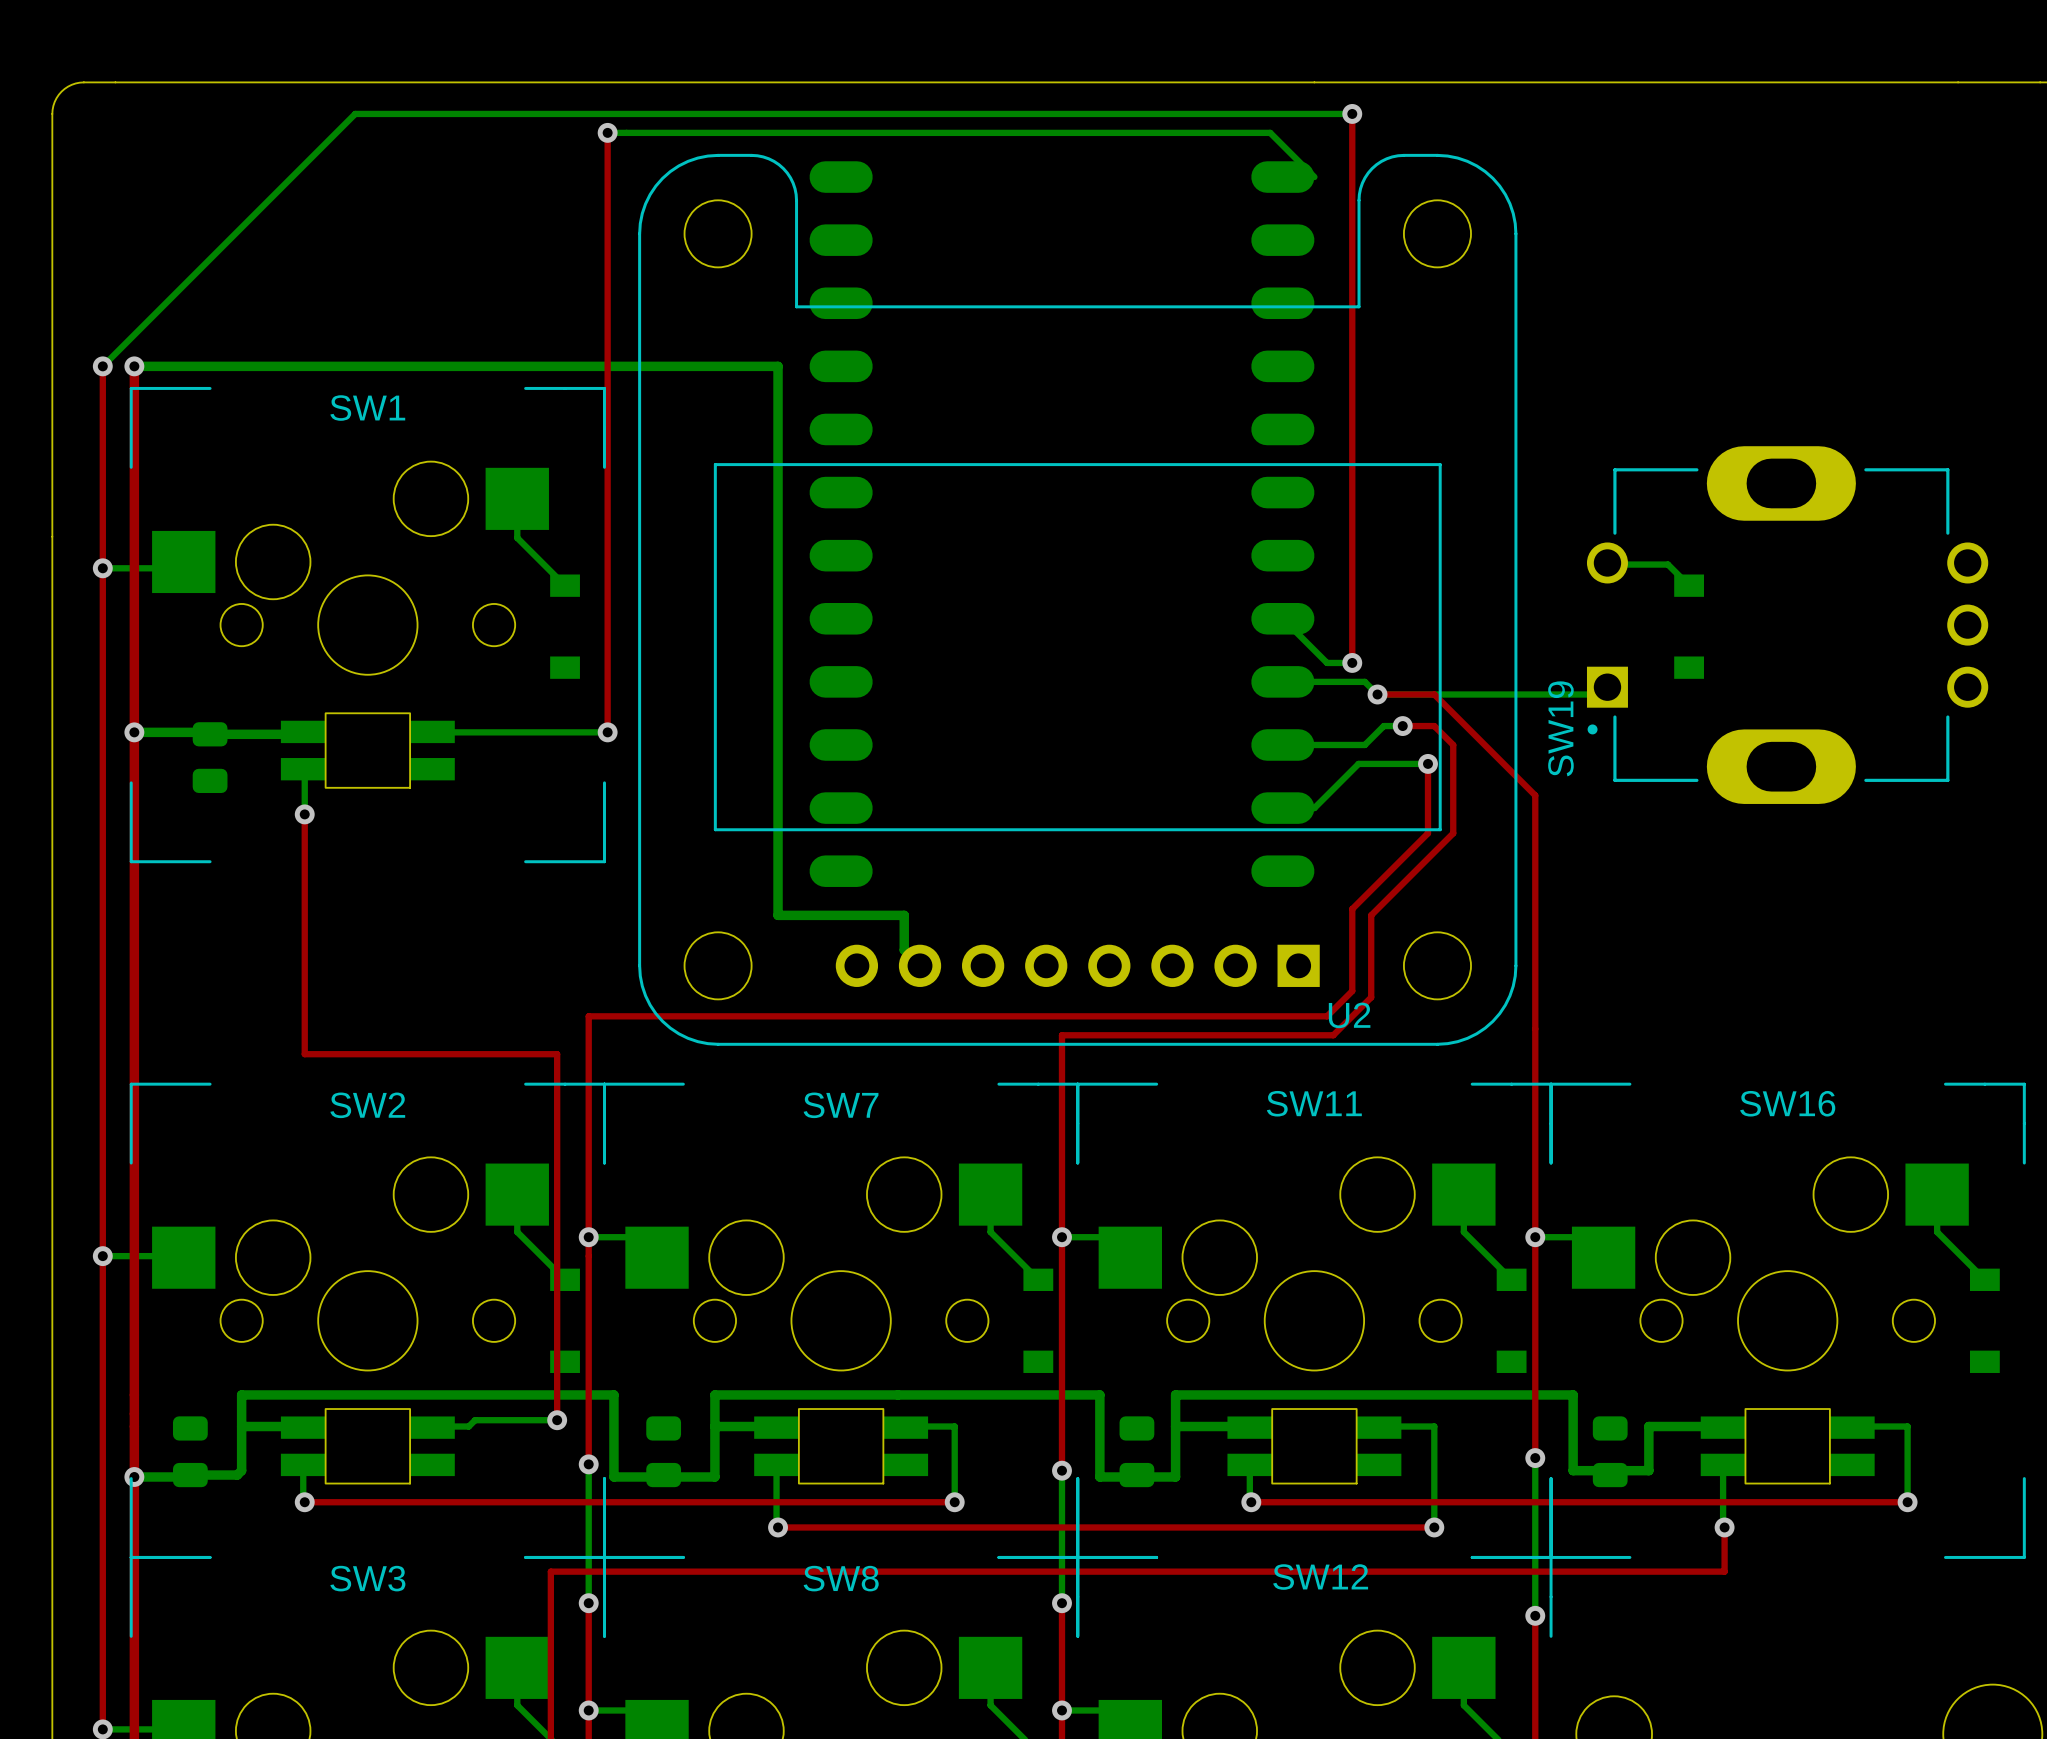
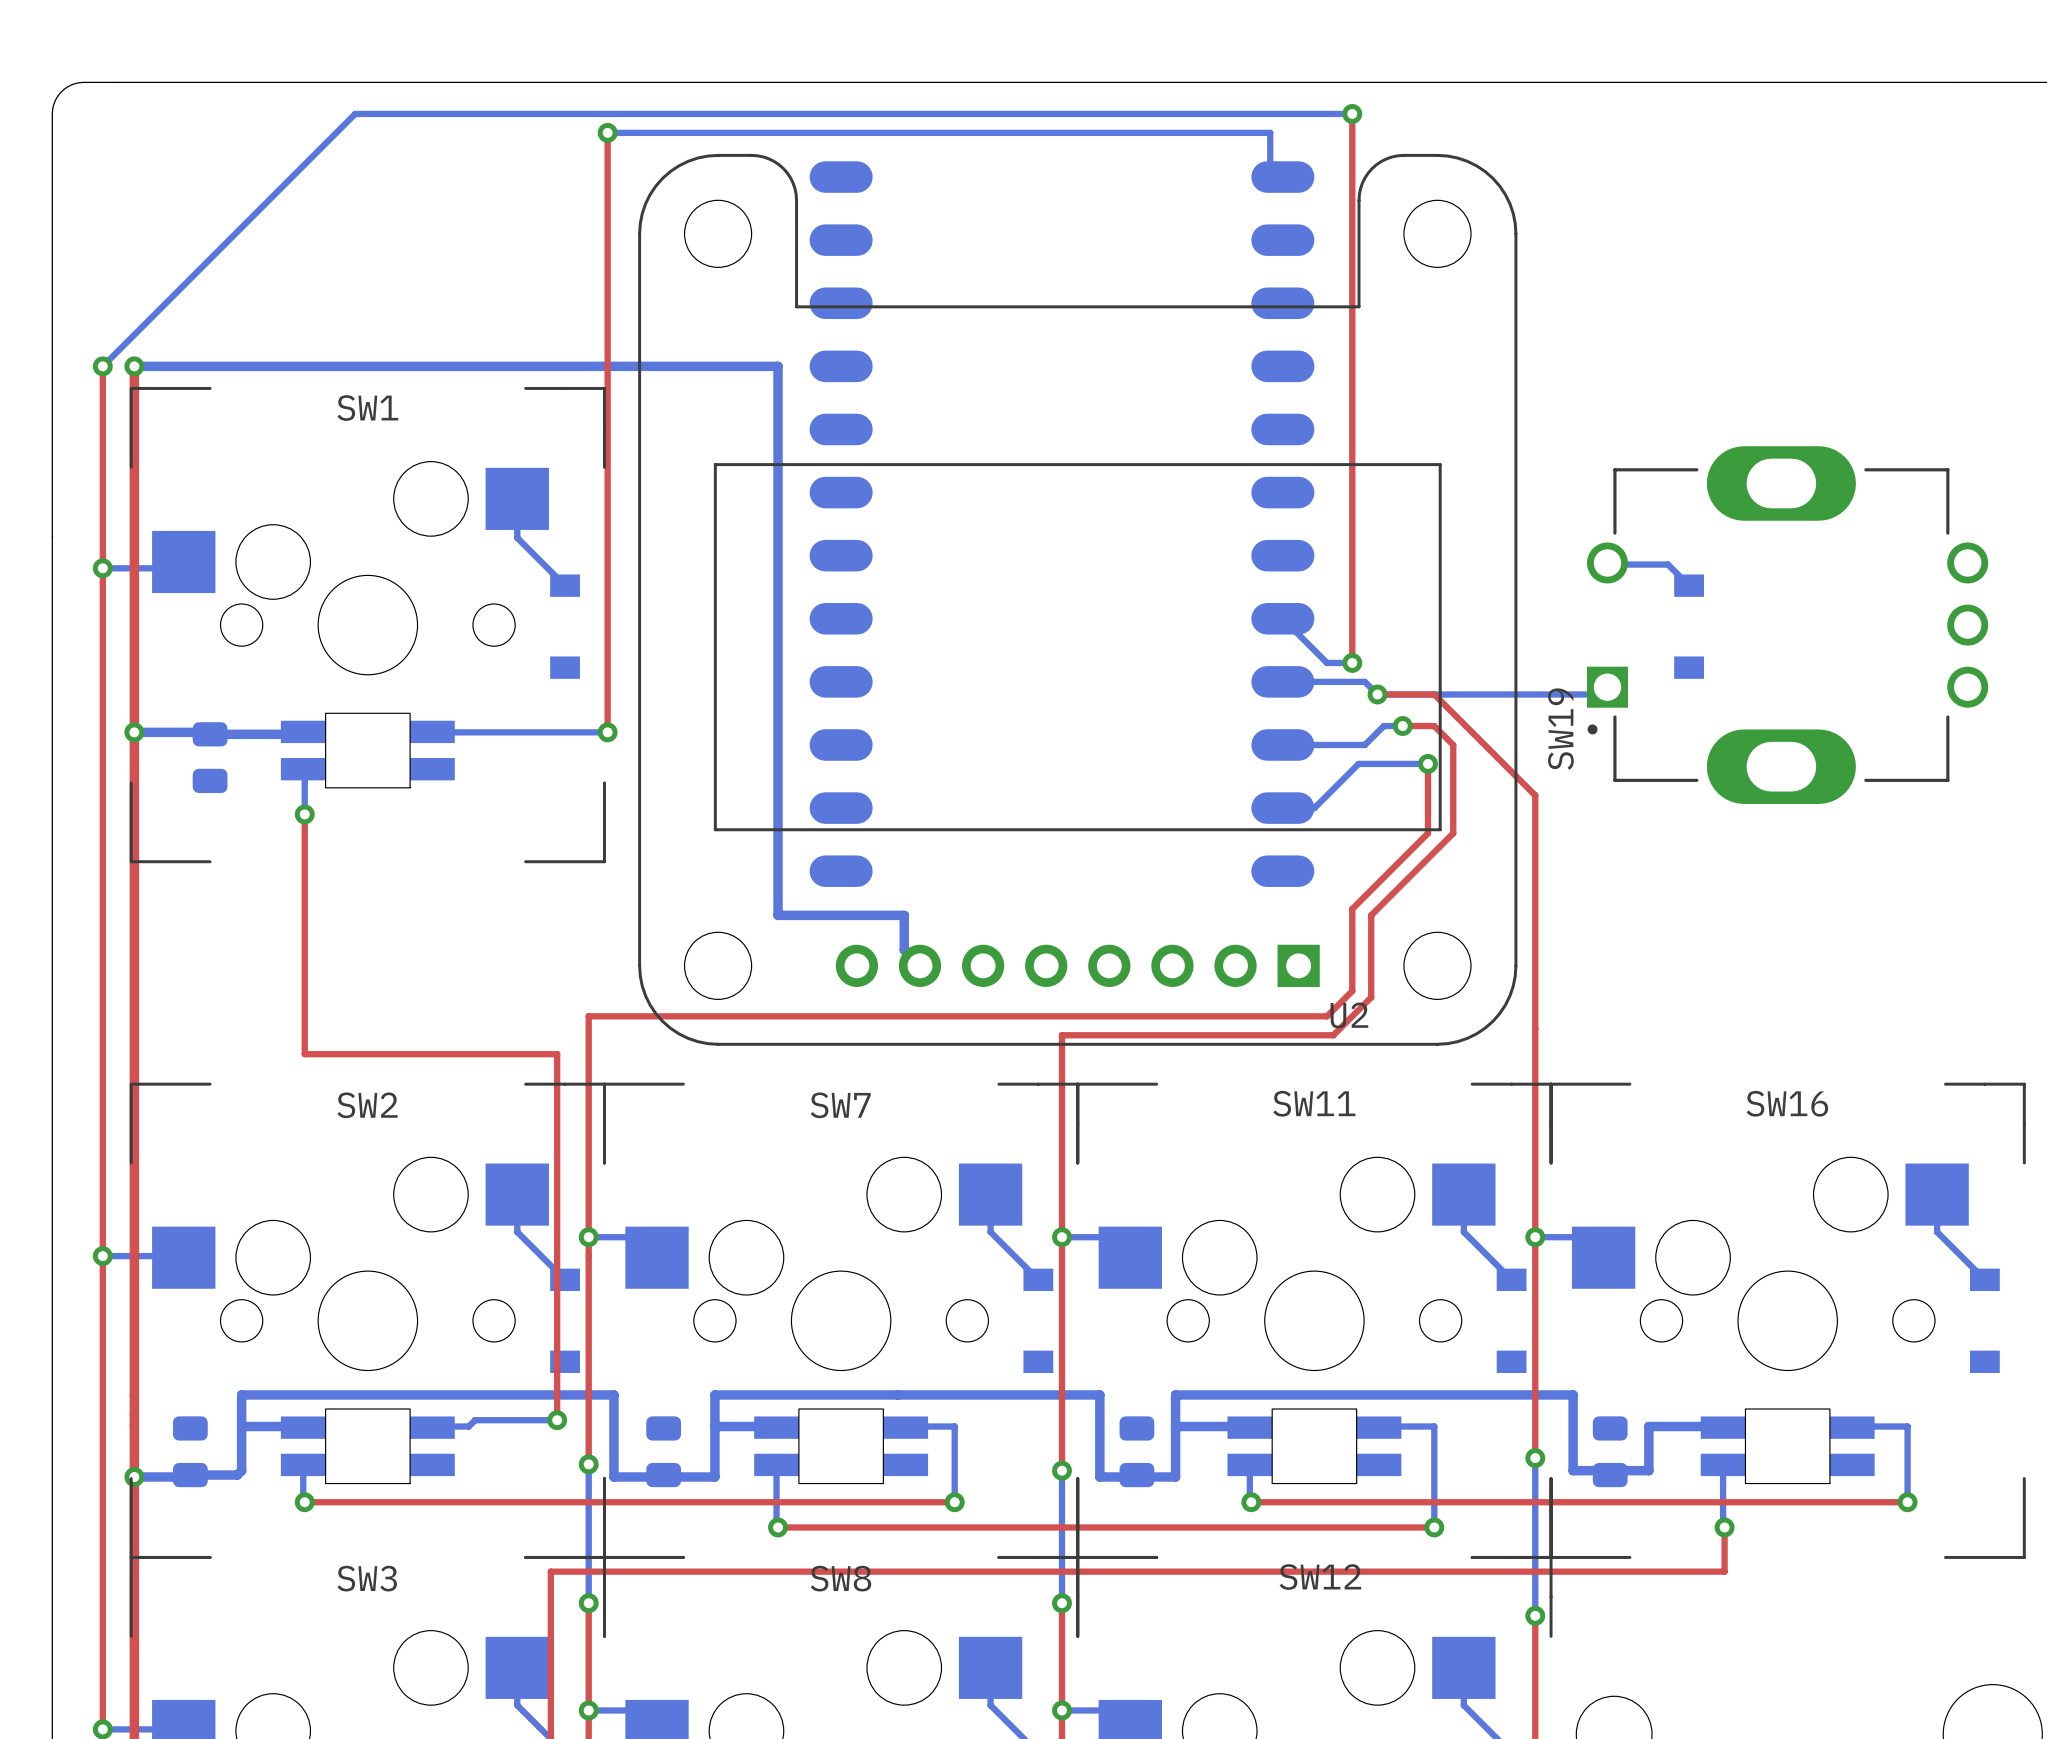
bottom track: (1270, 132) (1314, 177) -> (1270, 132) (1270, 164) (1282, 177)

